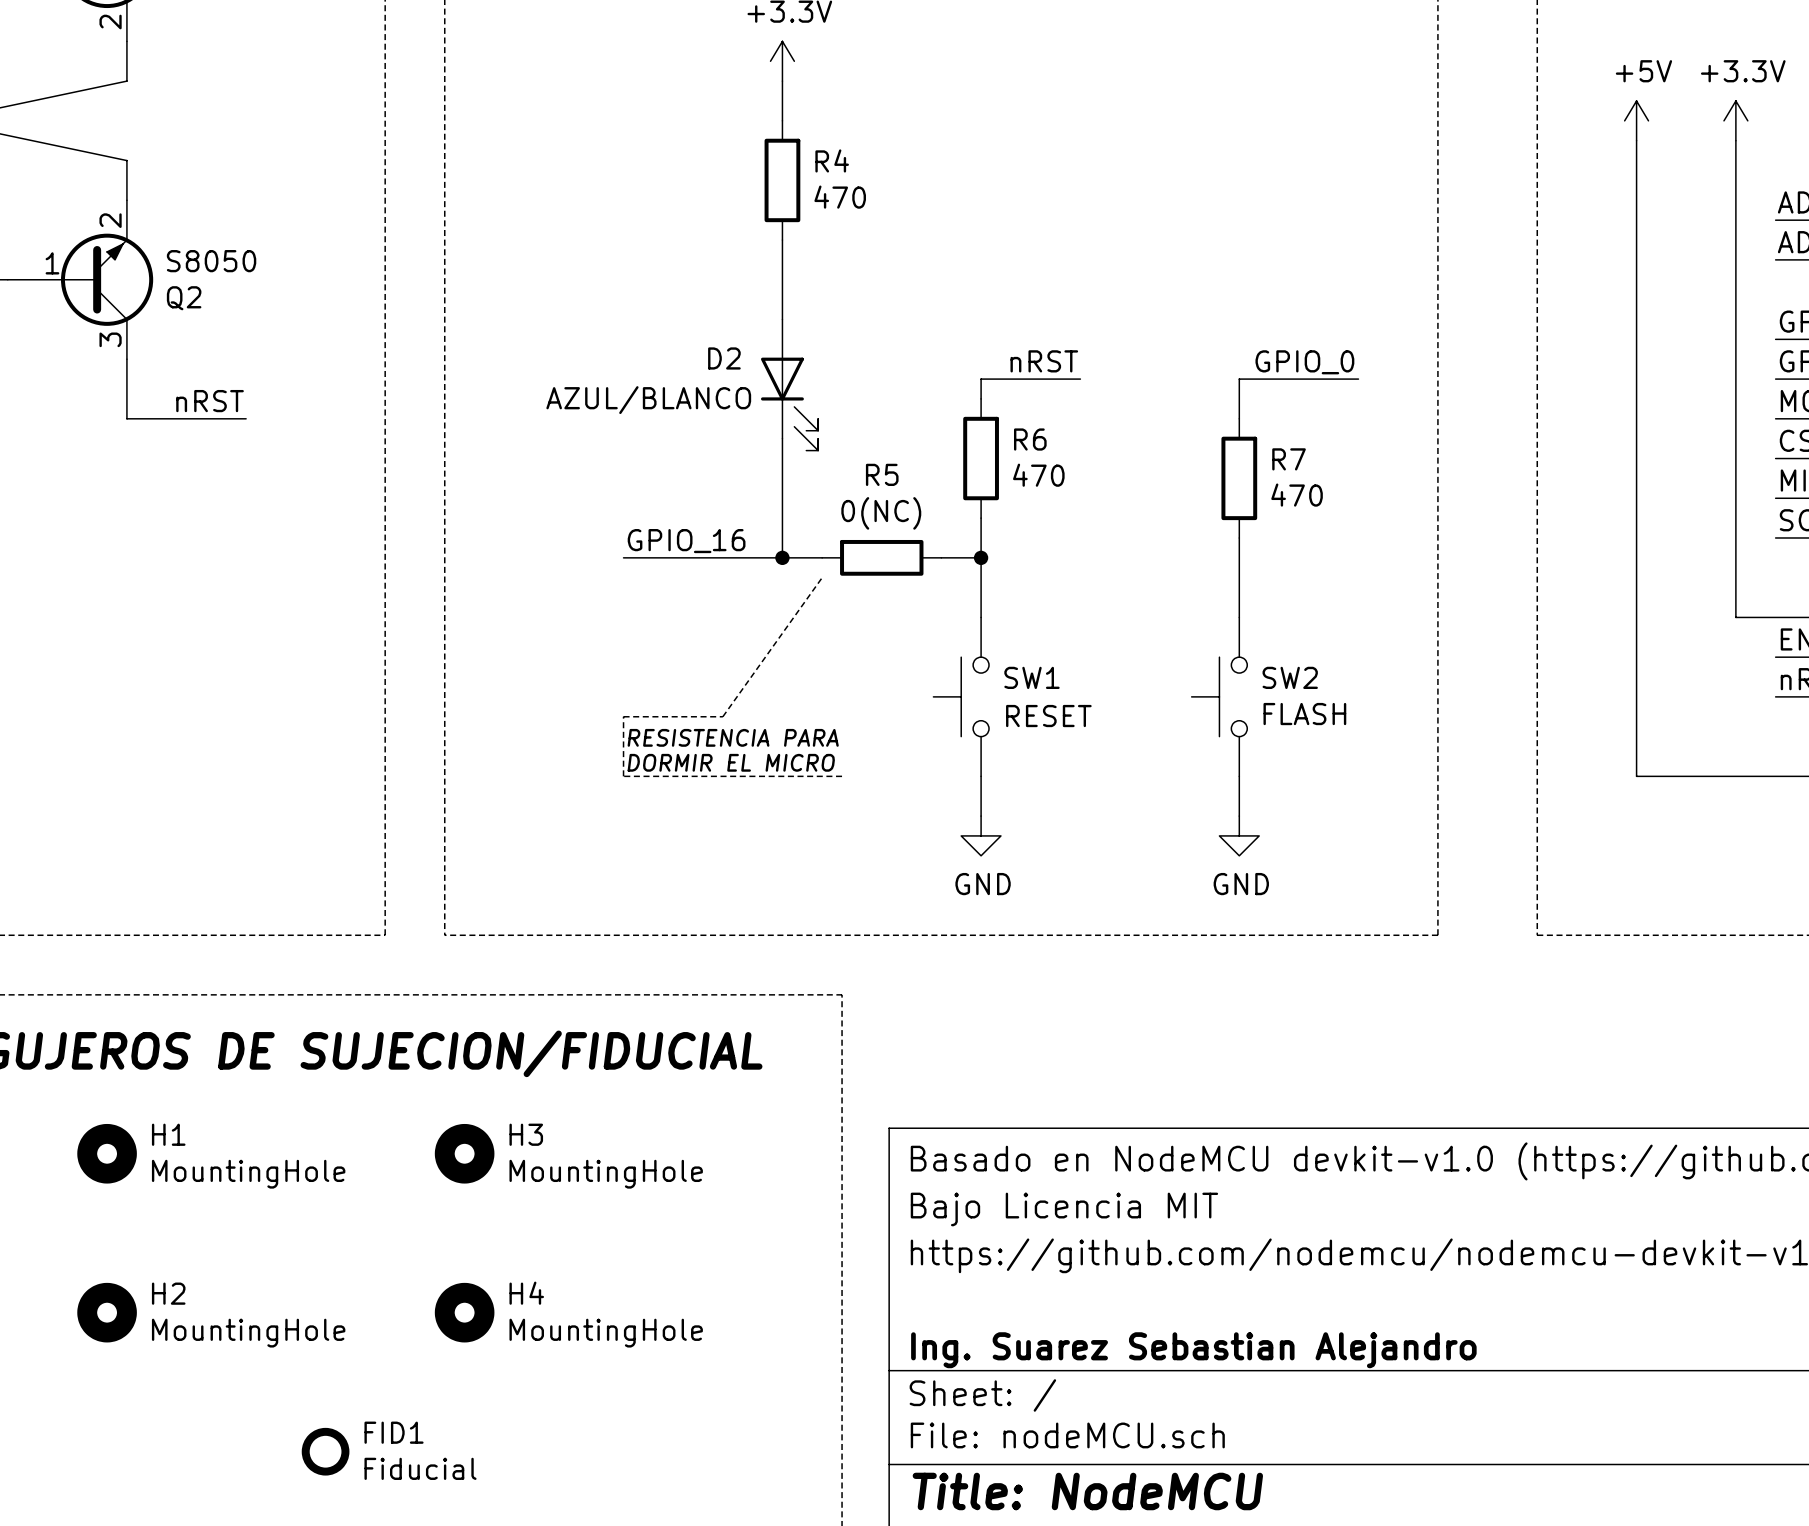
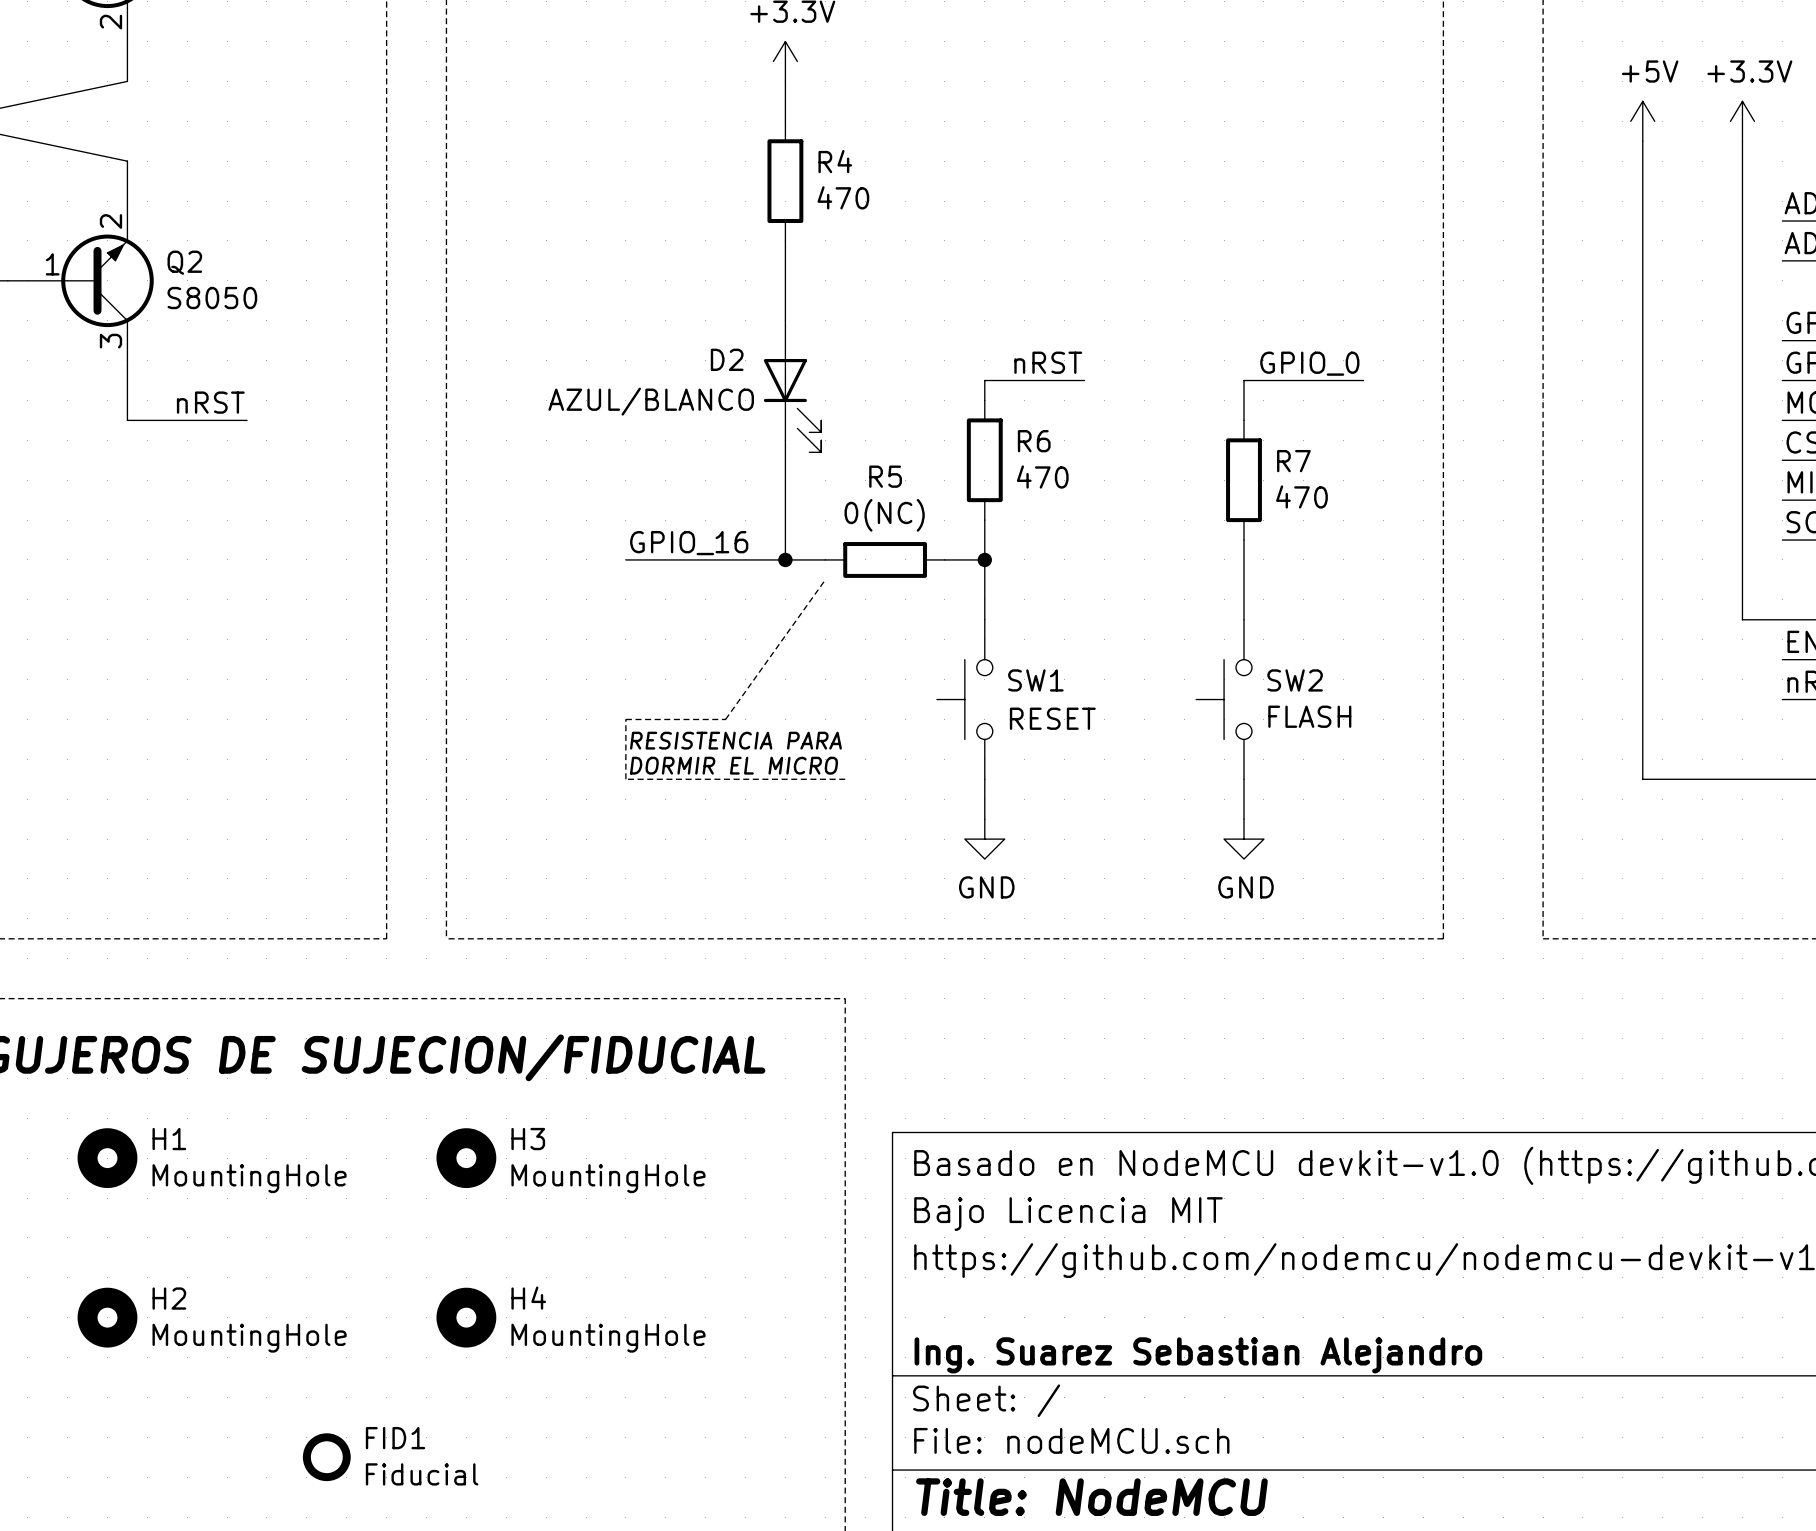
Q2 value position: S8050 (211, 261) -> S8050 (212, 298)
Q2 name position: Q2 (184, 298) -> Q2 (184, 262)

